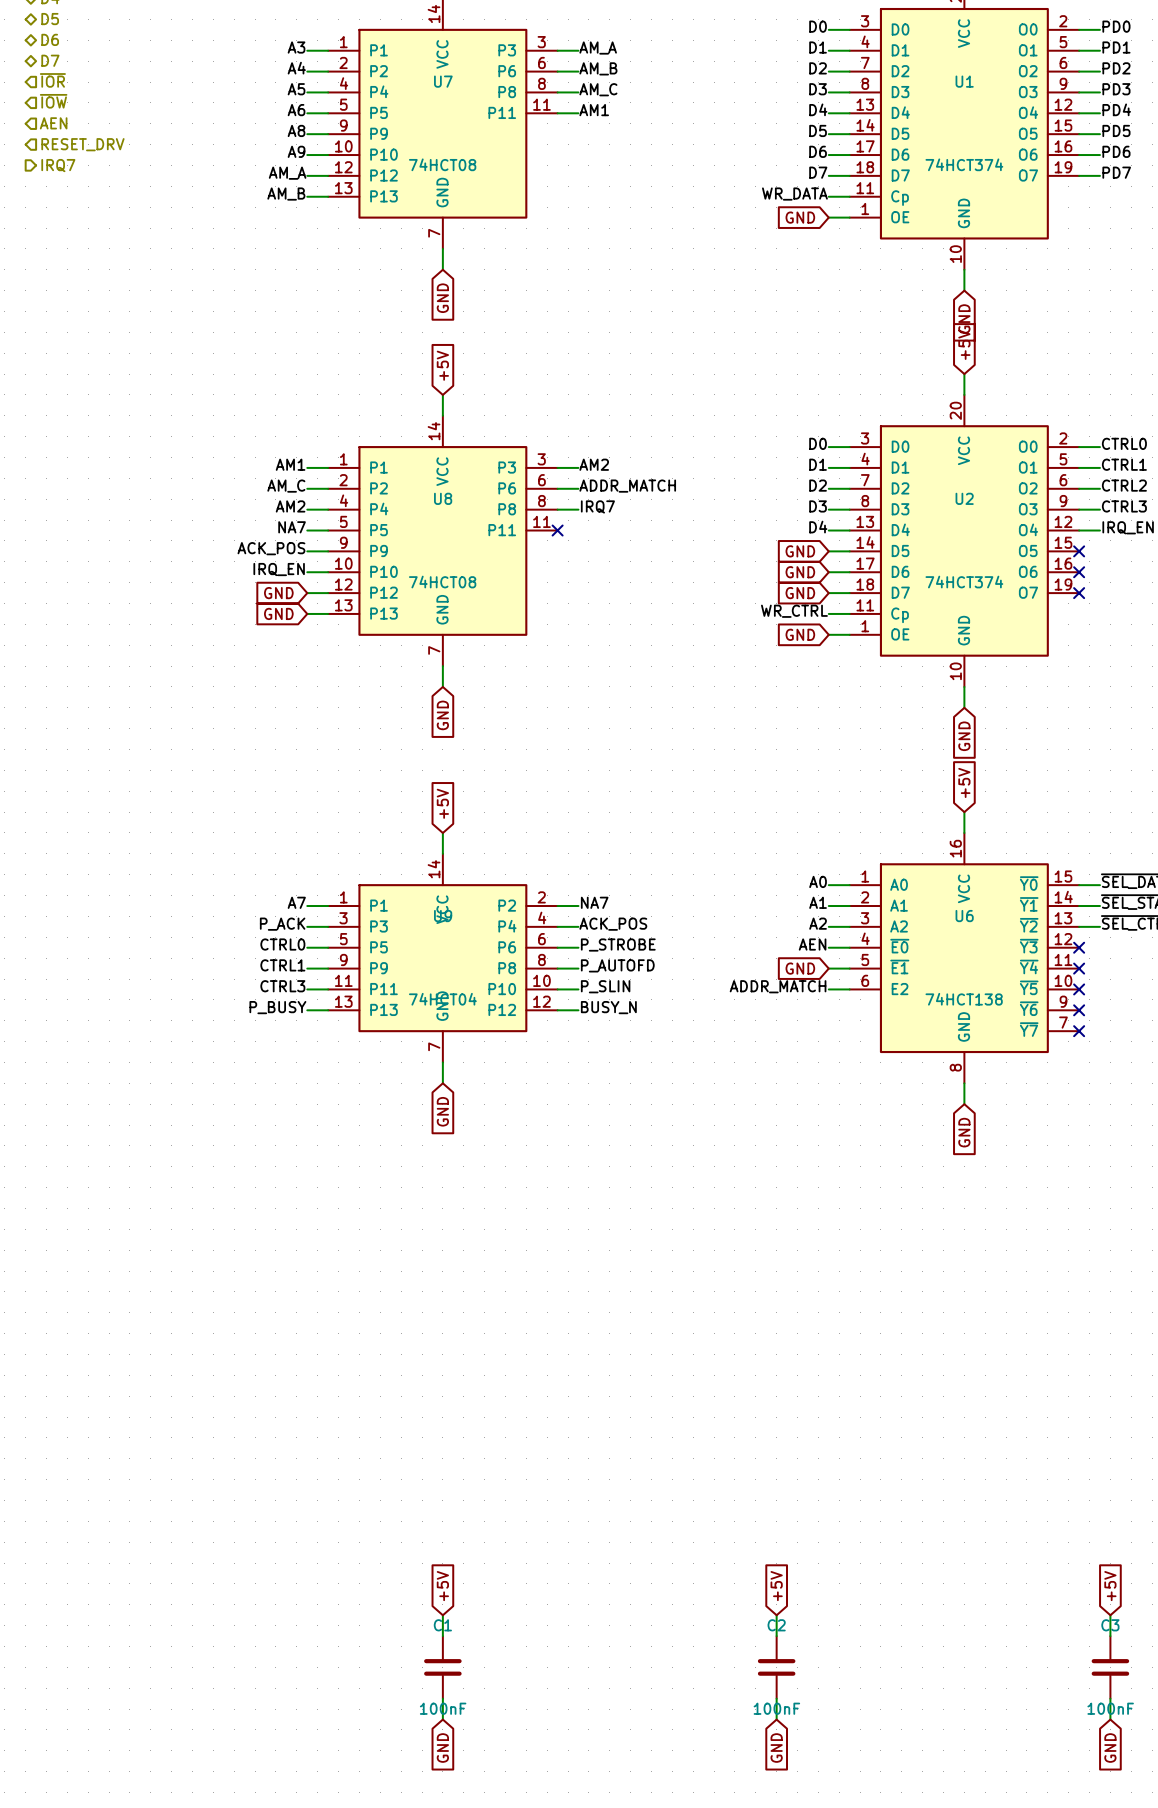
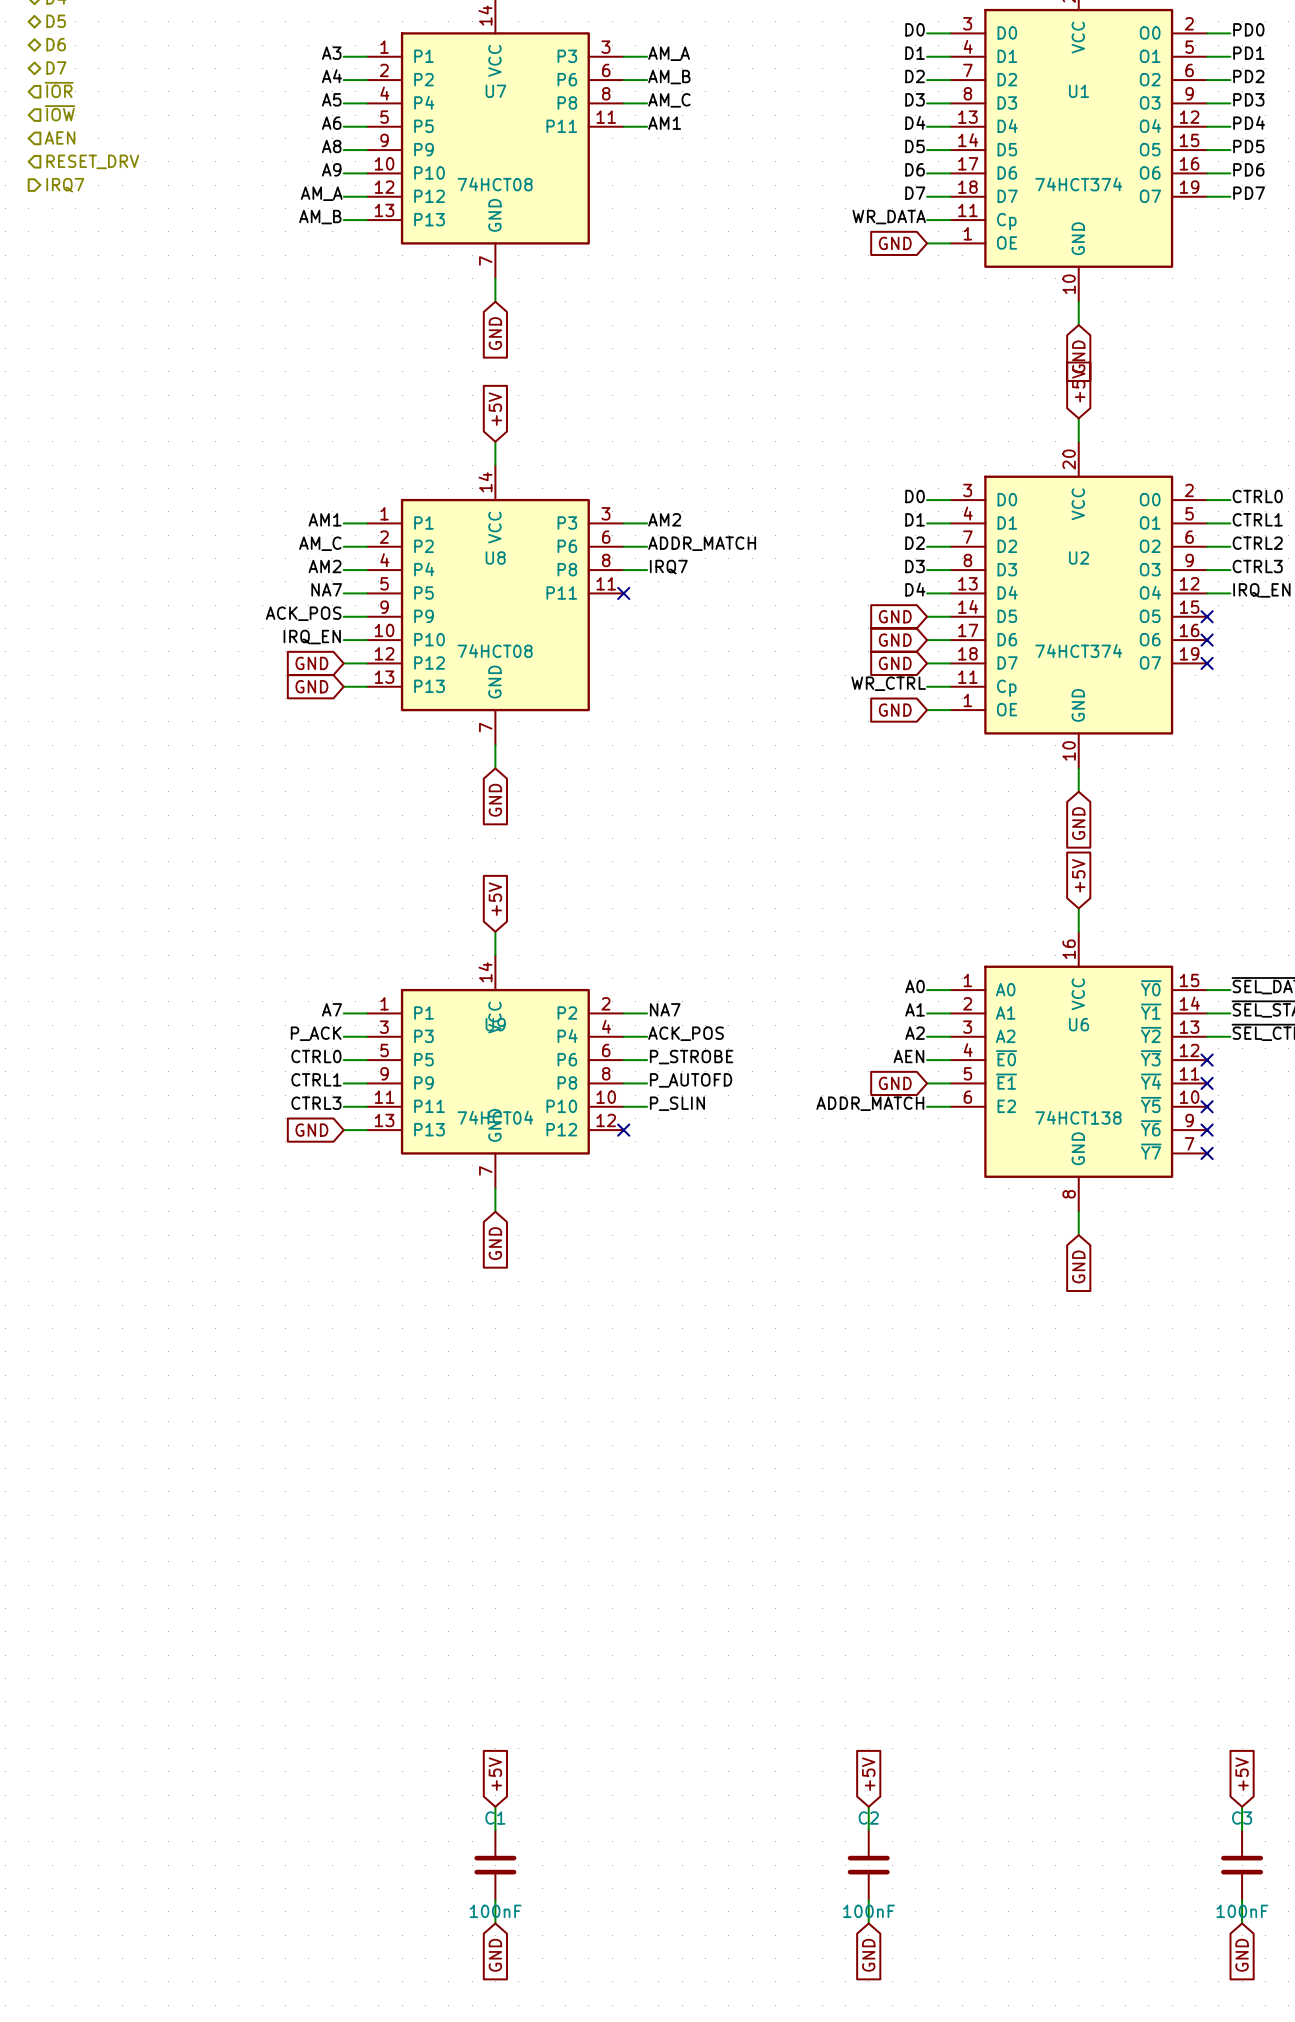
label: P_BUSY (277, 1007) -> none
label: BUSY_N (608, 1007) -> none
global label: none -> GND (311, 1130)
wire: (557, 1010) (578, 1010) -> none
no-connect mark: none -> (623, 1130)

